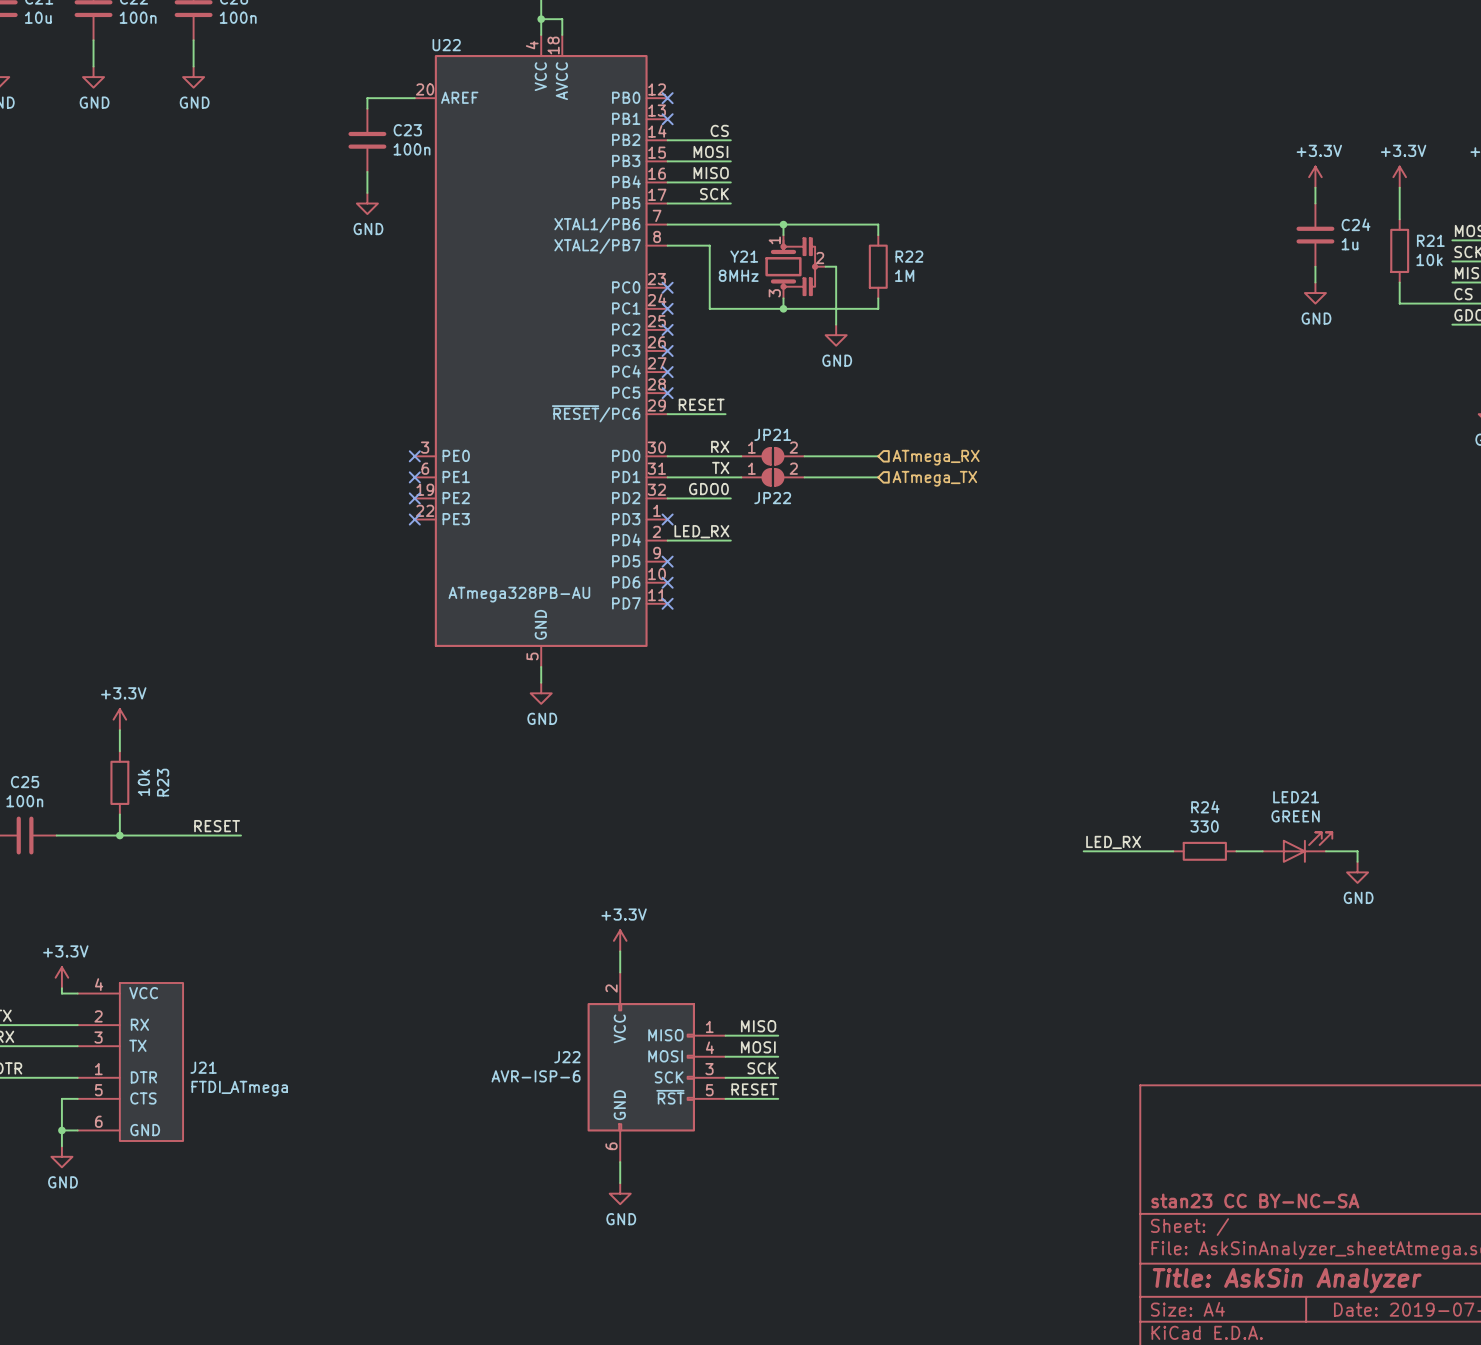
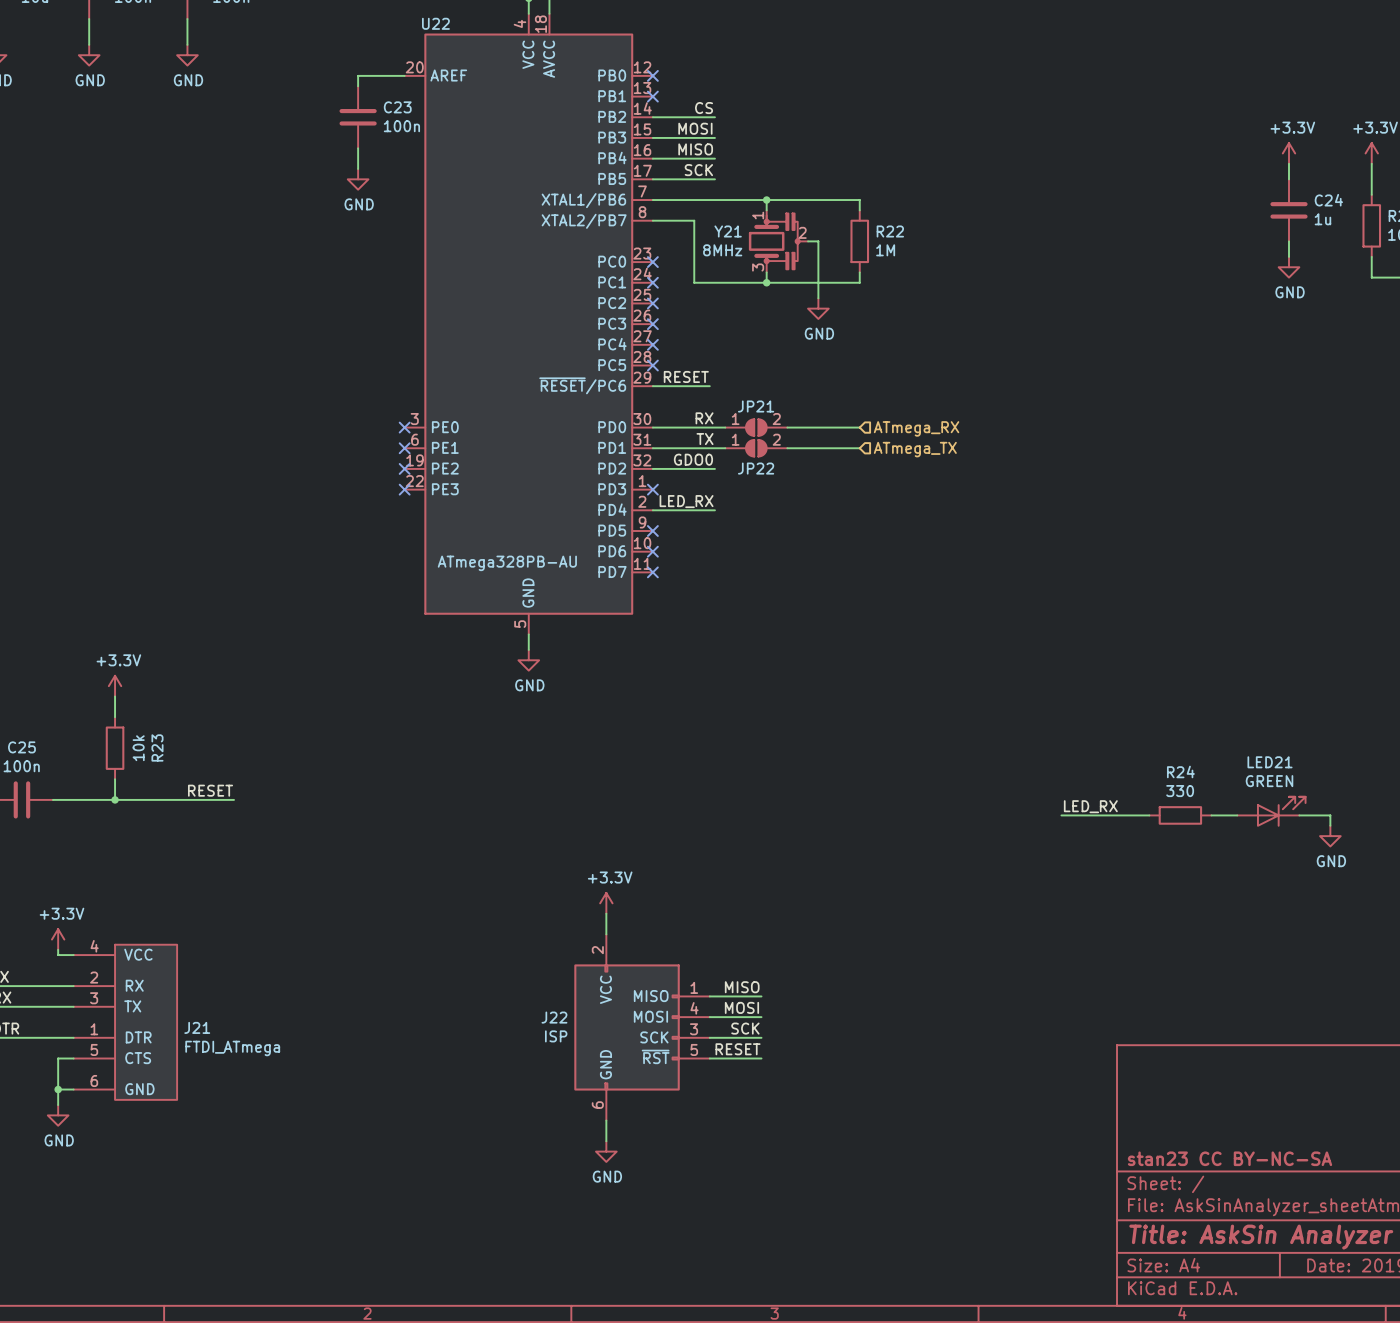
J22 value: AVR-ISP-6 (536, 1076) -> ISP (556, 1036)

